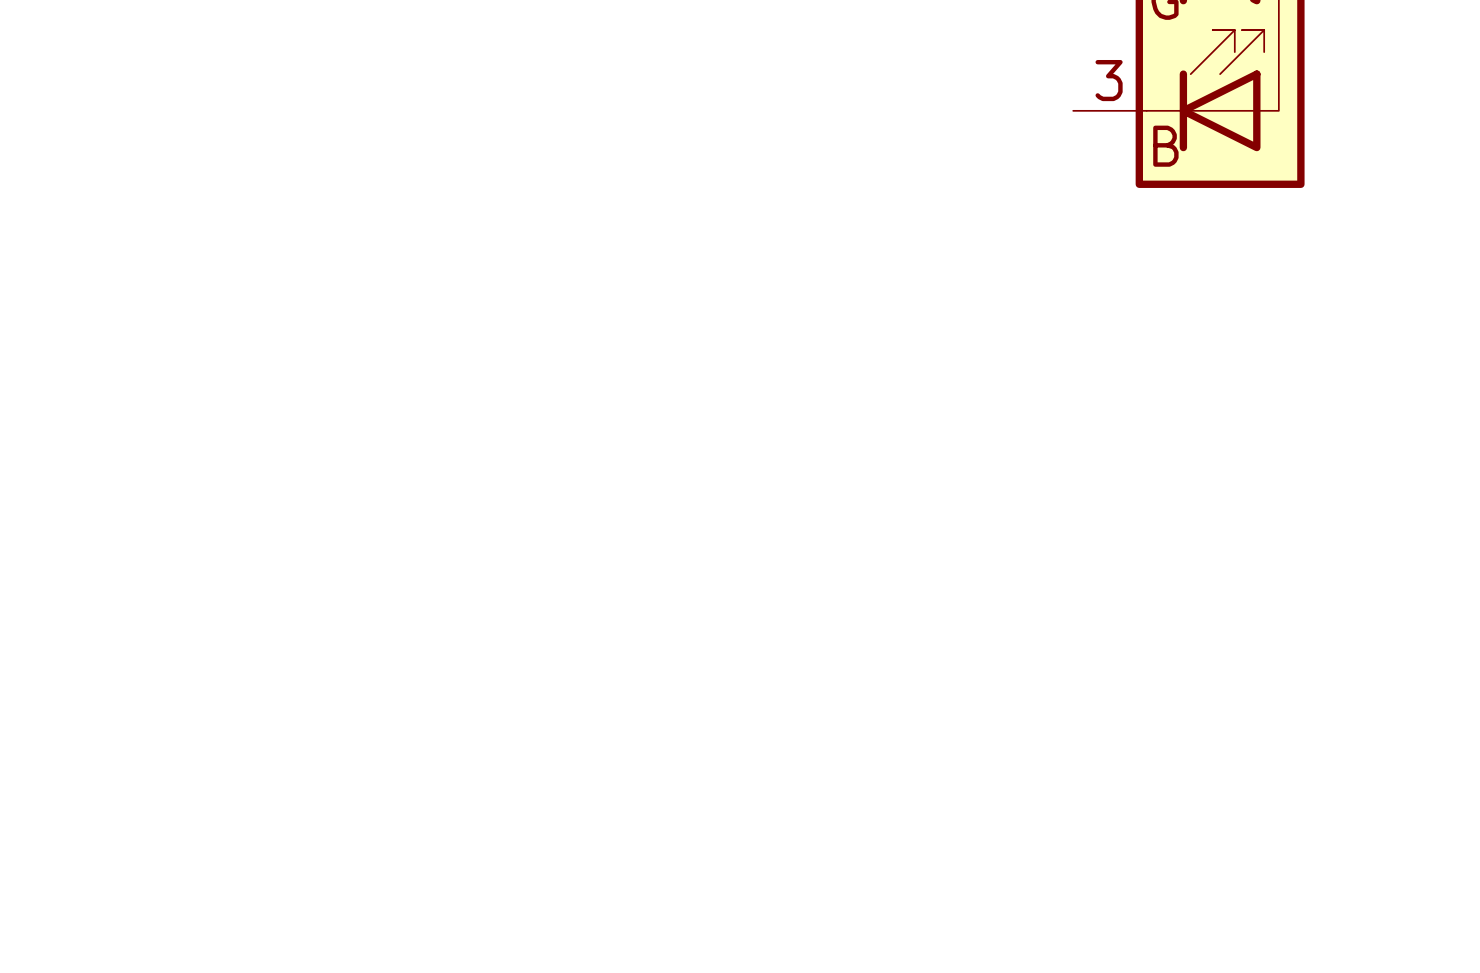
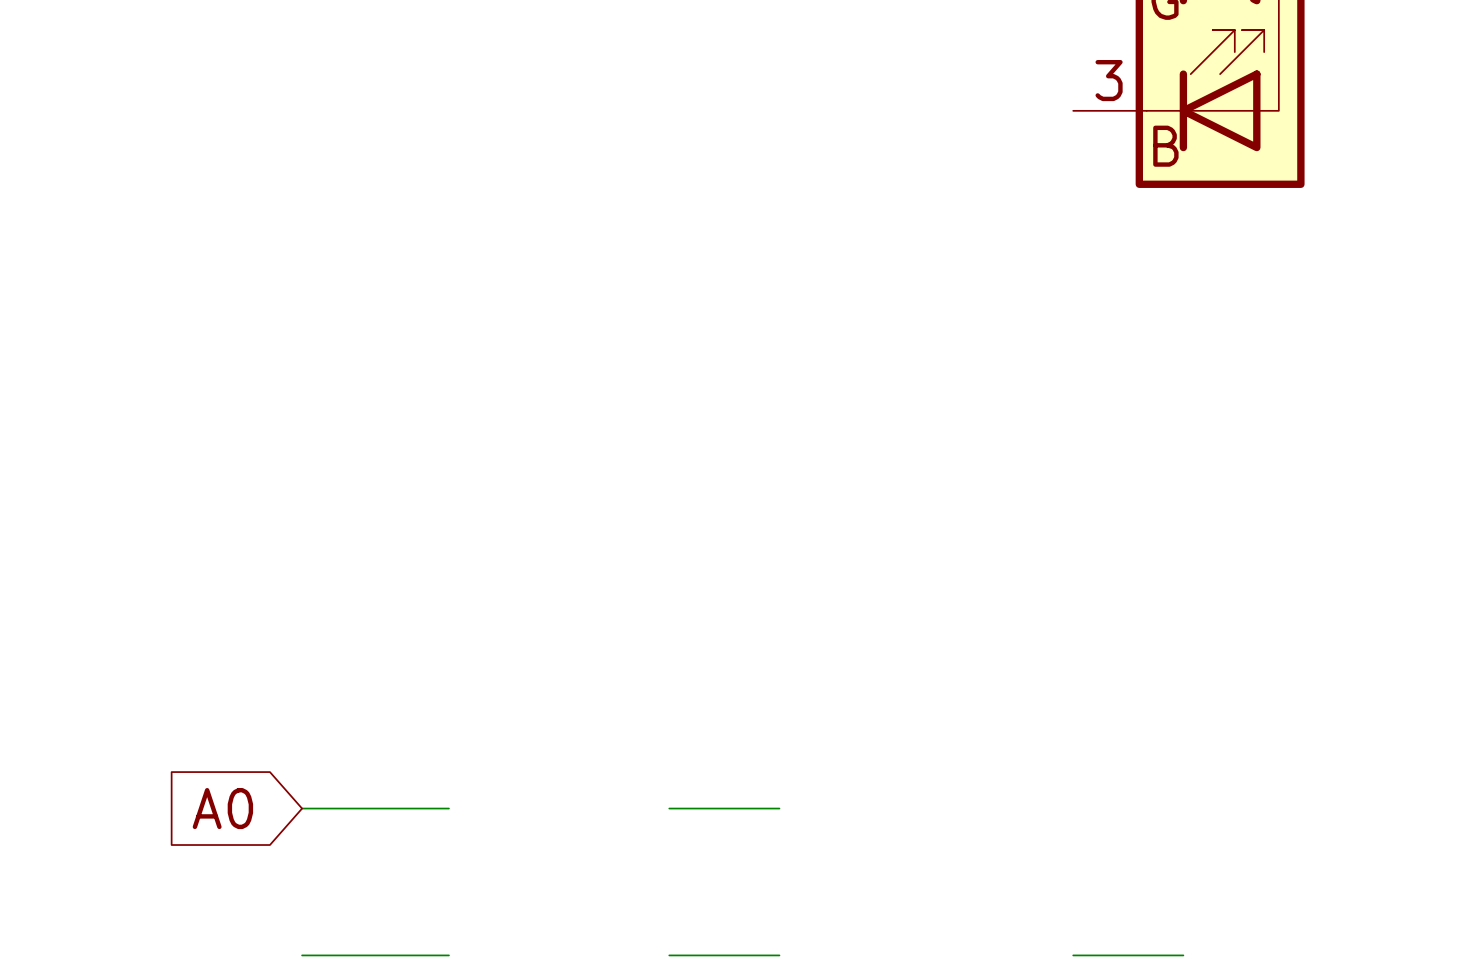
global label: none -> A0 (222, 808)
wire: none -> (302, 808) (448, 808)
wire: none -> (669, 808) (779, 808)
wire: none -> (302, 955) (448, 955)
wire: none -> (669, 955) (779, 955)
wire: none -> (1073, 955) (1183, 955)

